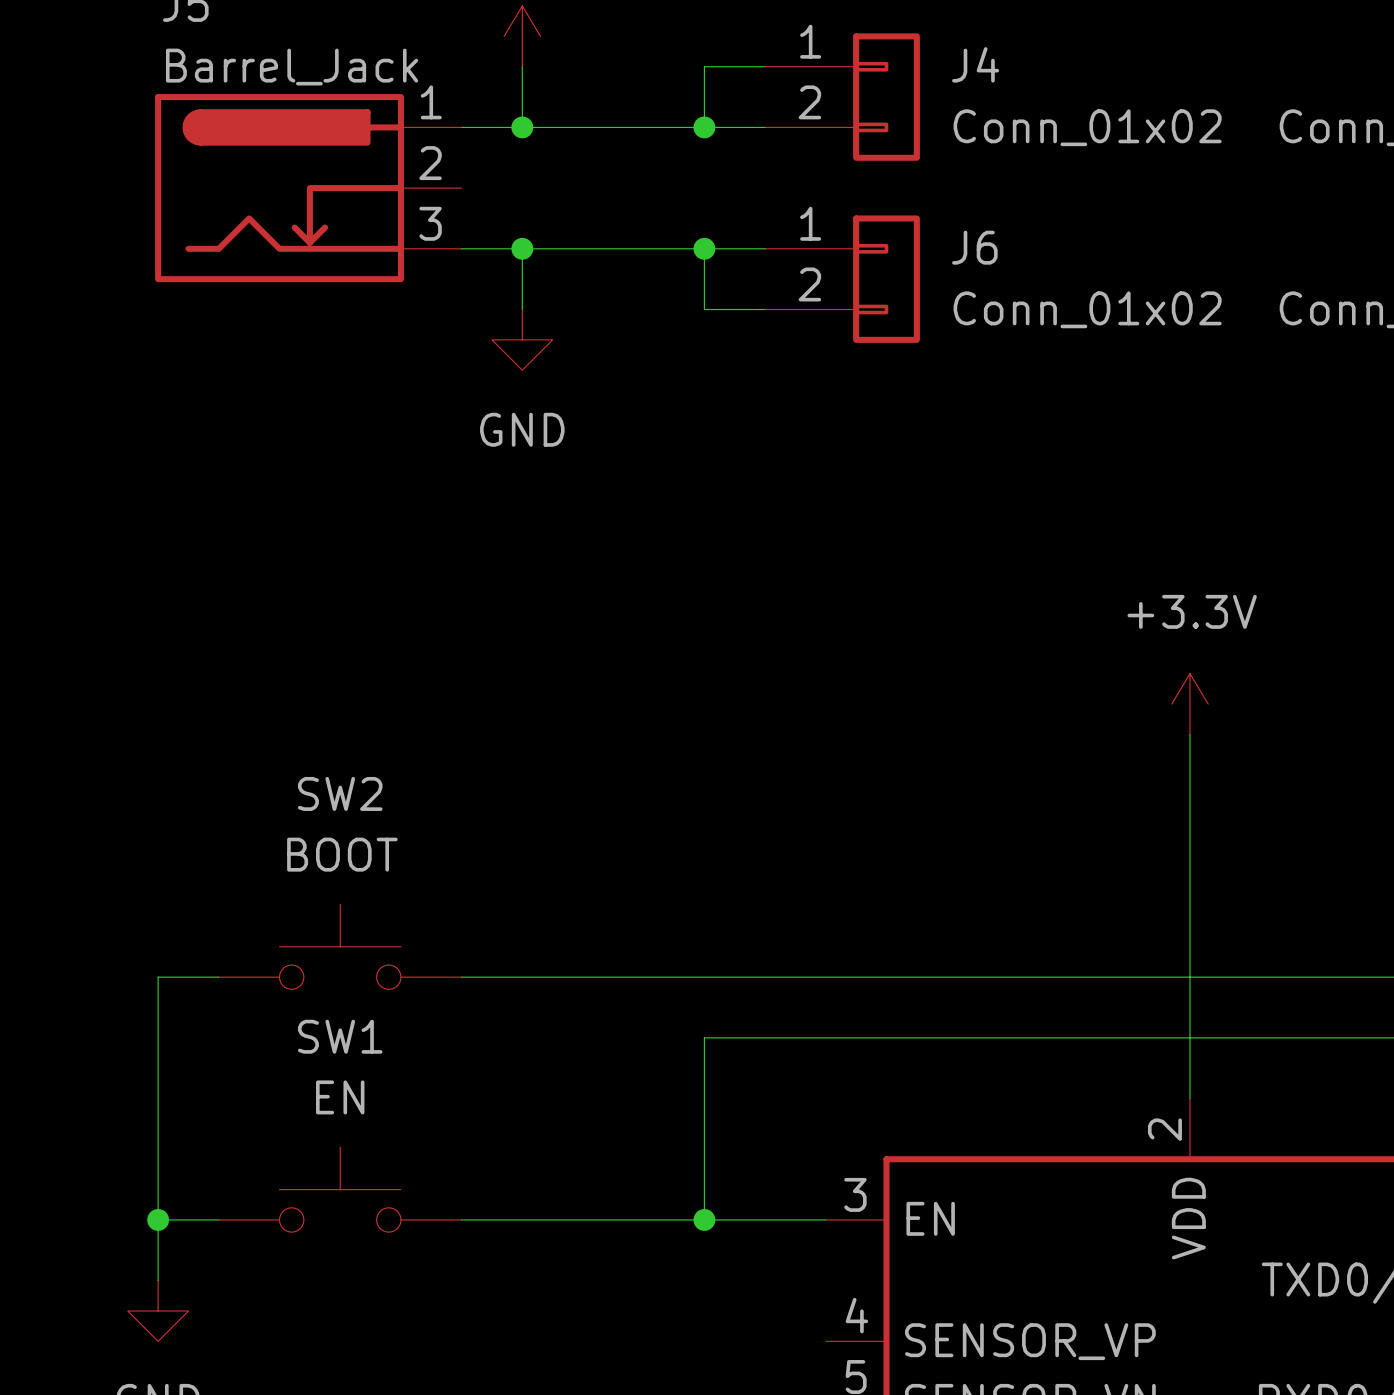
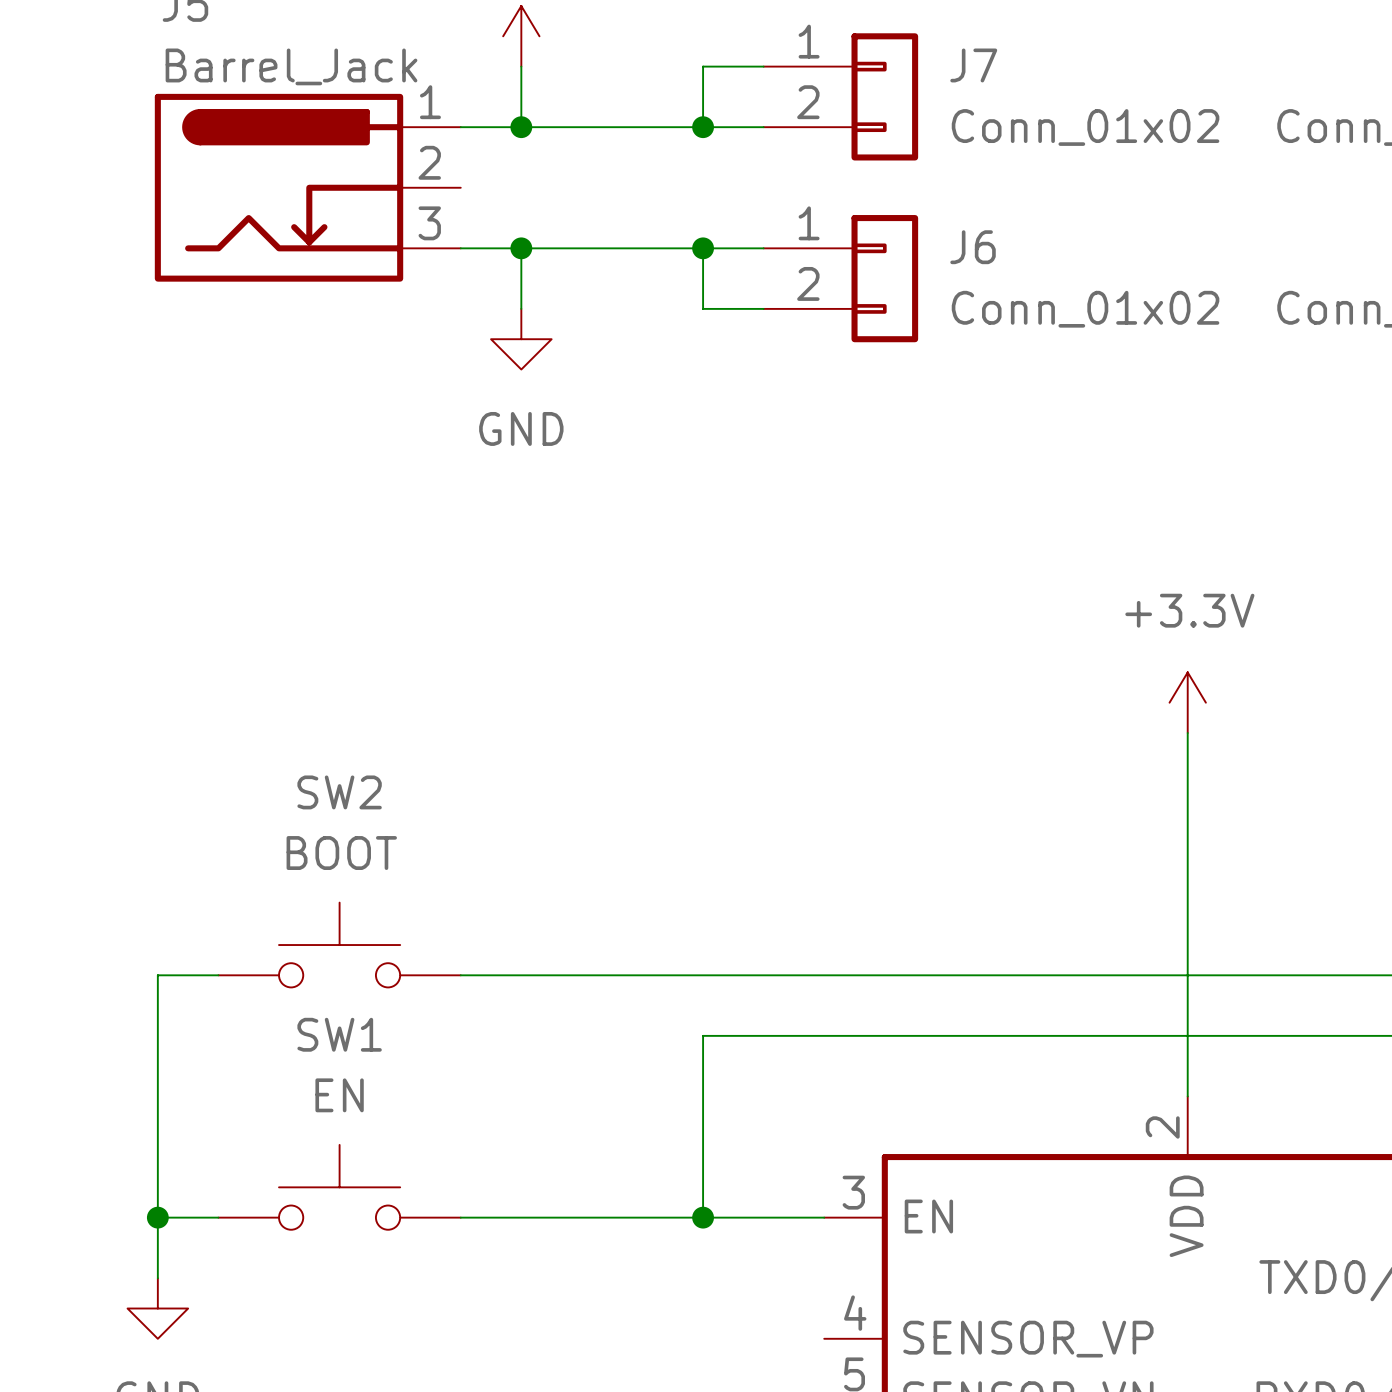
J4 name: J4 (975, 64) -> J7 (973, 65)

